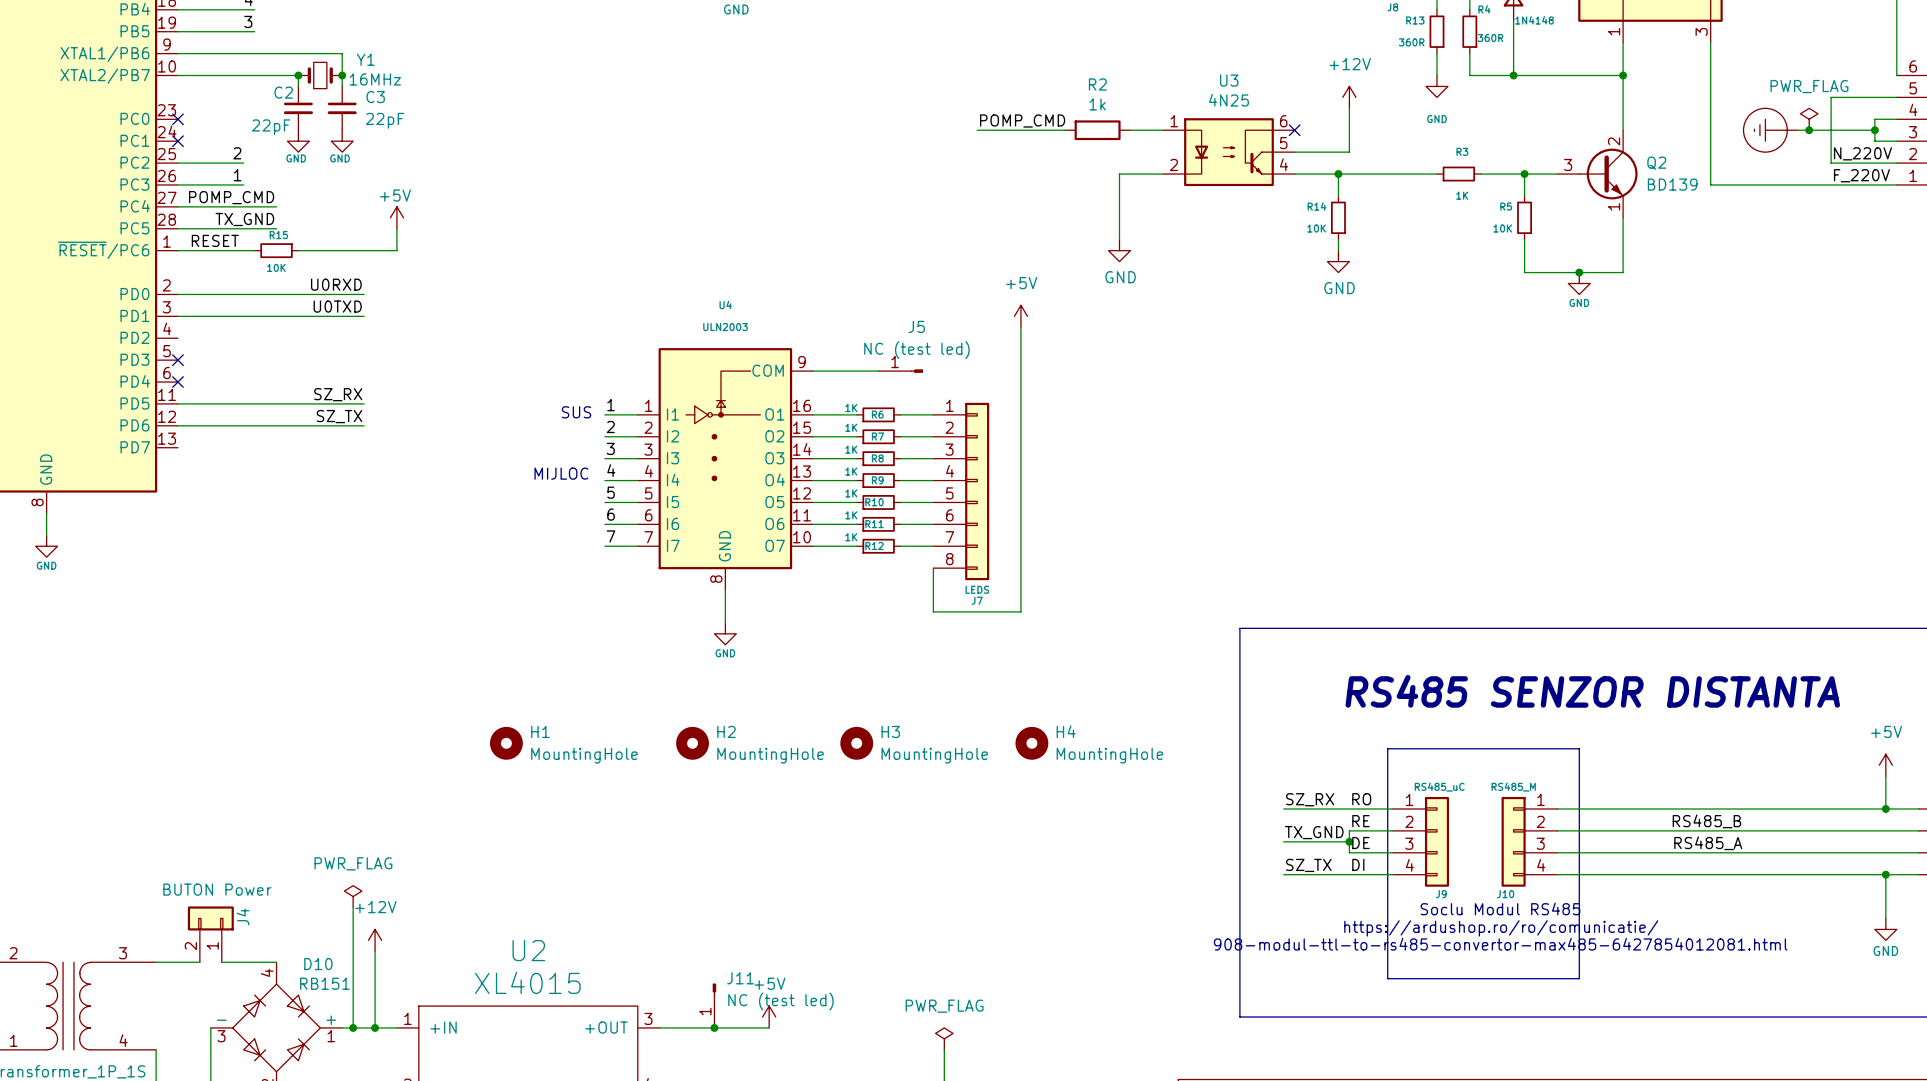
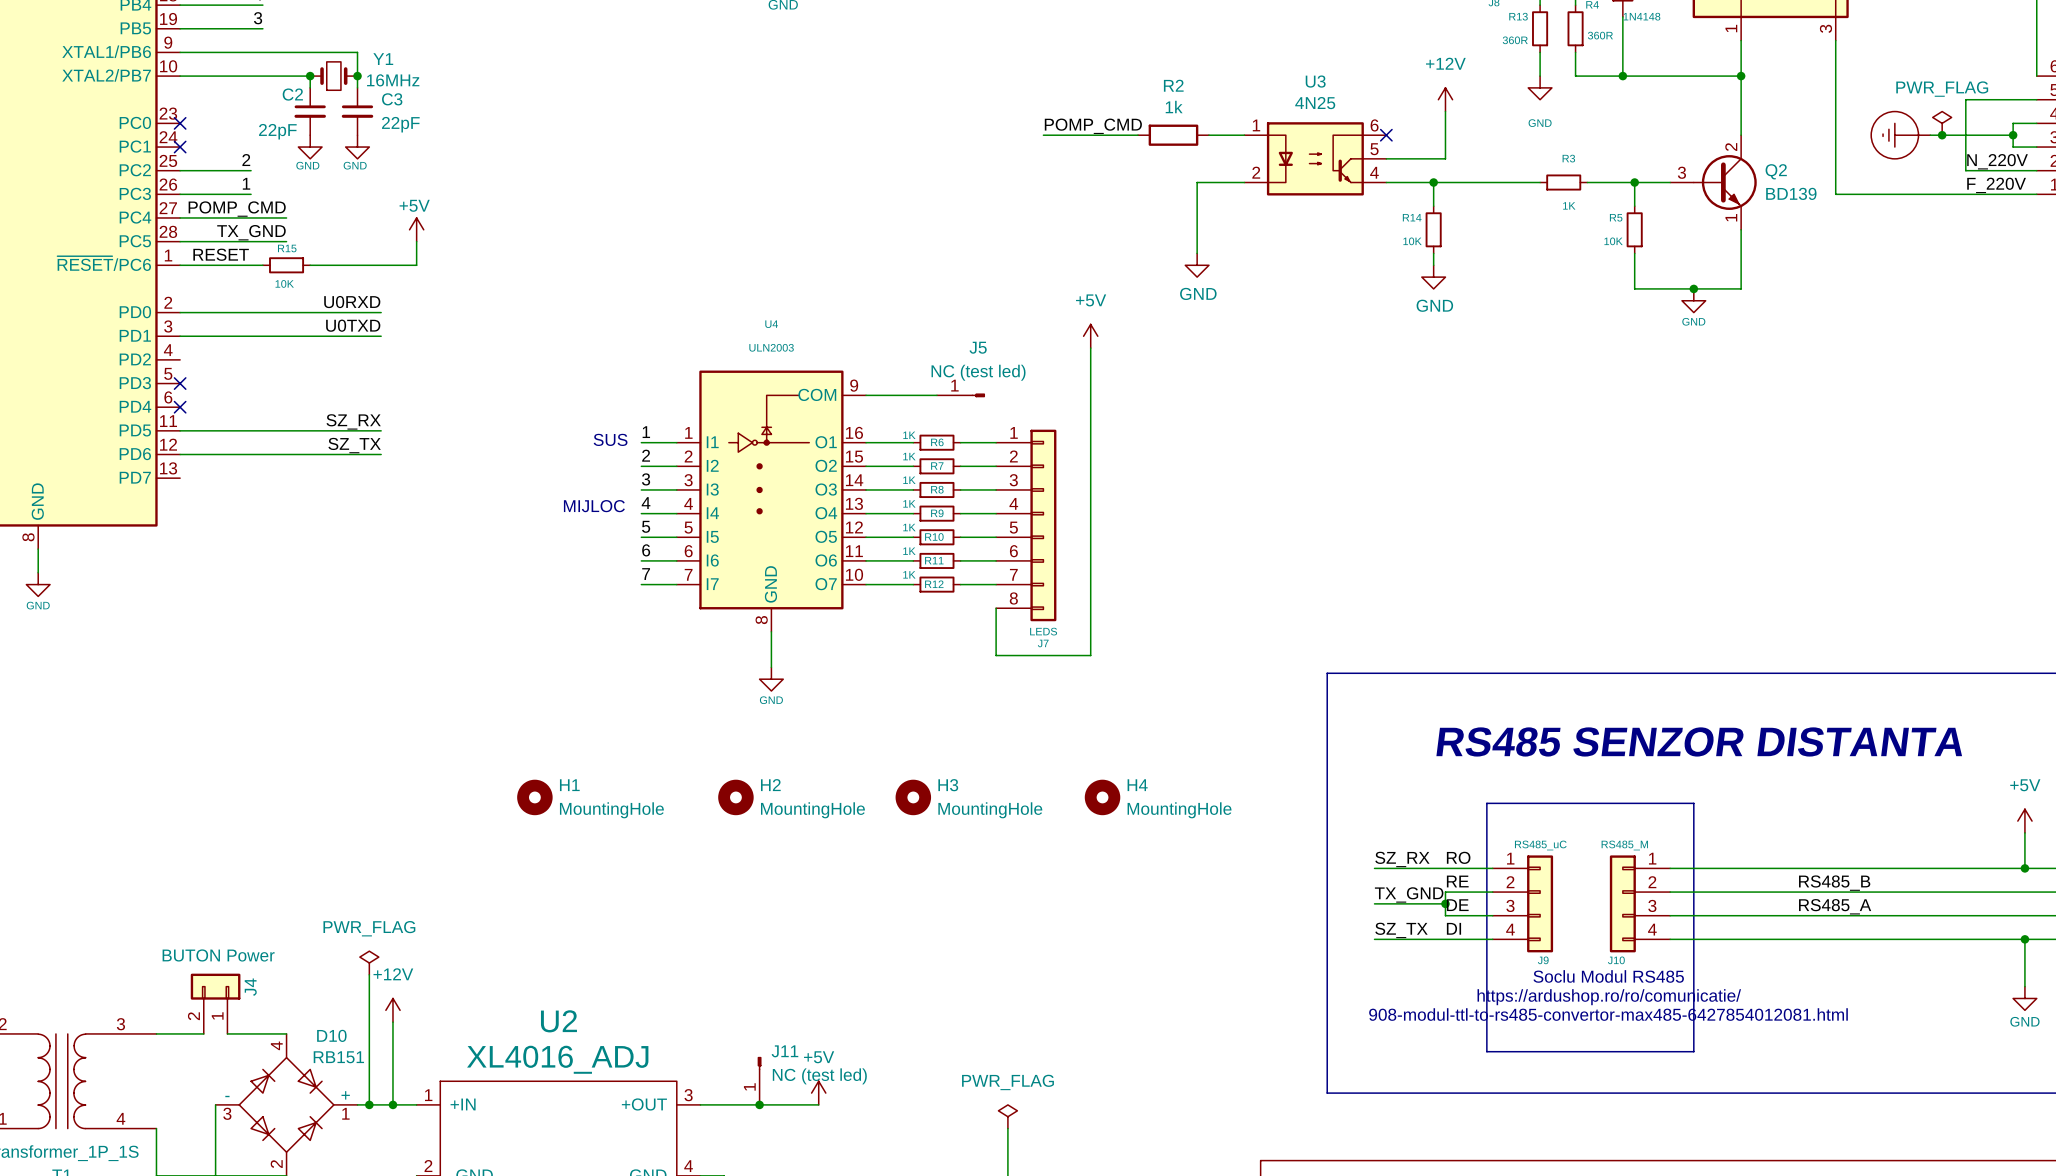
U2 value: XL4015 (527, 982) -> XL4016_ADJ (557, 1059)

